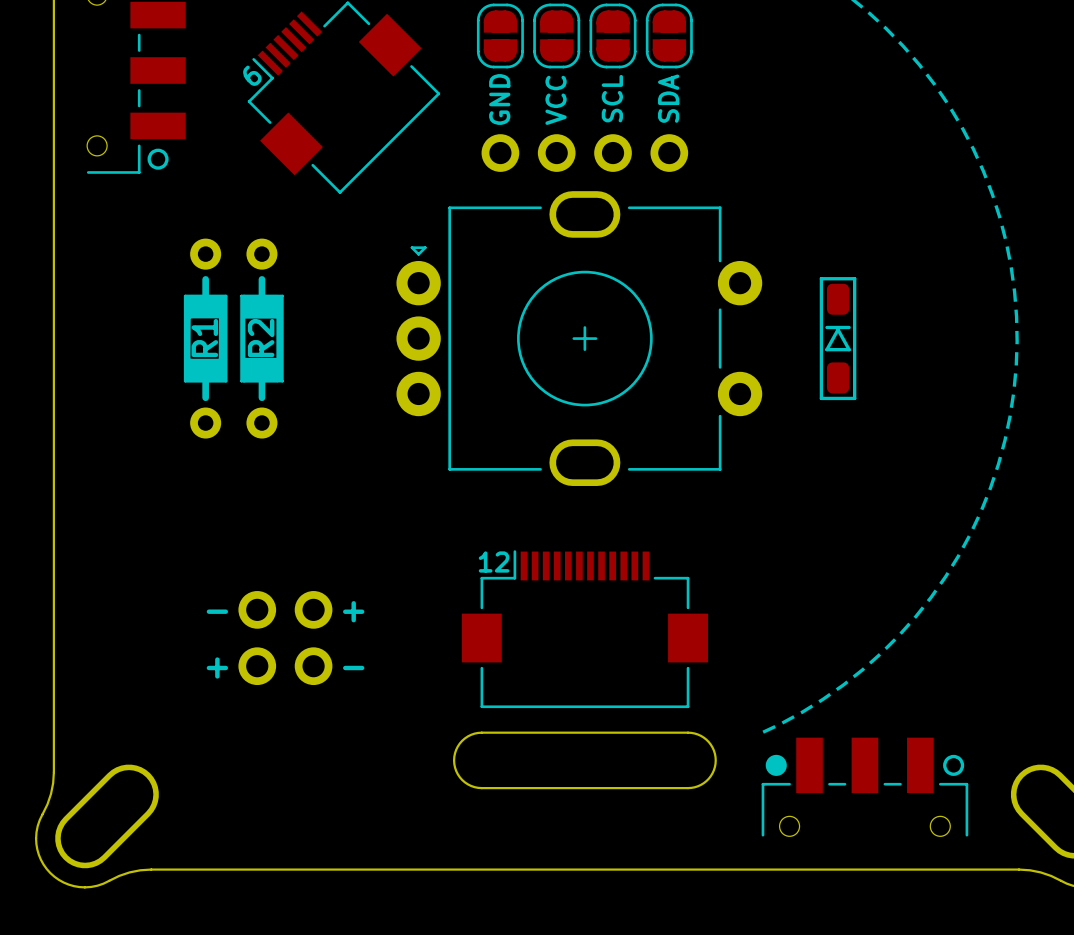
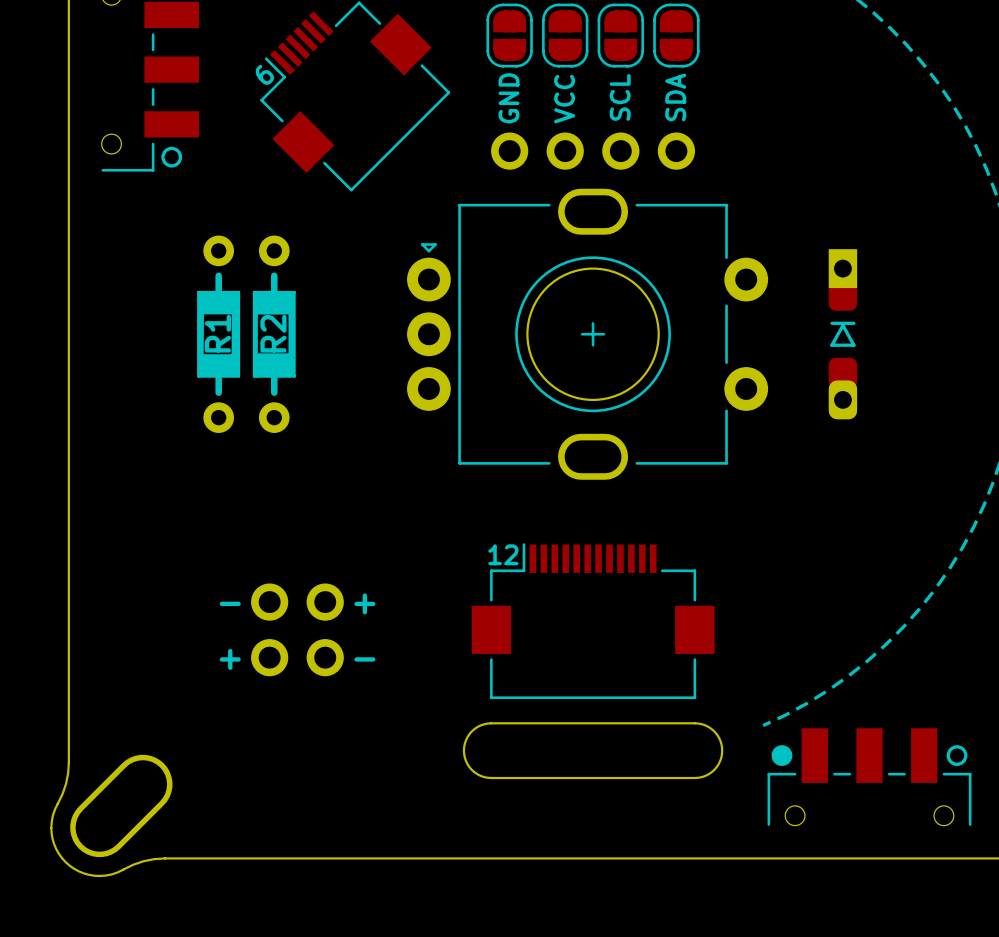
part footprint: [396, 191, 763, 486] -> [407, 188, 769, 480]
round board edge: none -> [526, 267, 660, 402]
part footprint: [819, 277, 857, 401] -> [828, 249, 858, 420]

